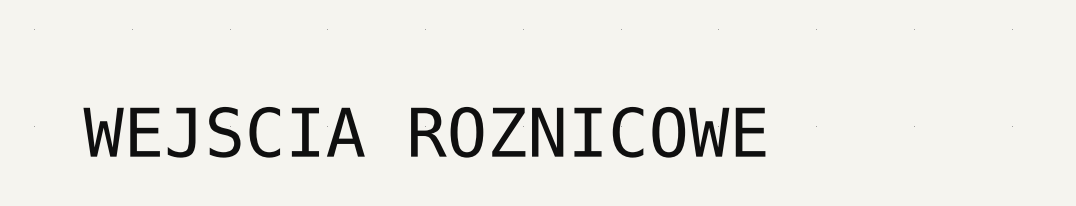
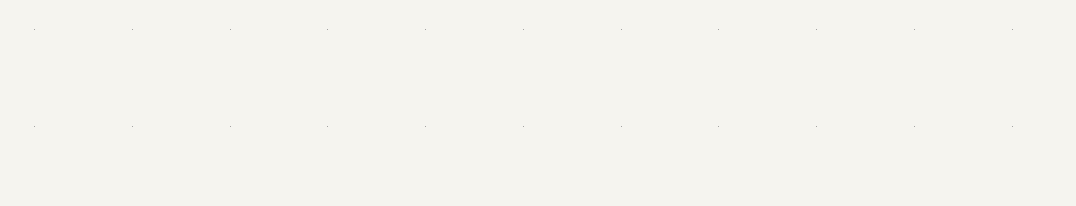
label: WEJSCIA ROZNICOWE (424, 132) -> none

